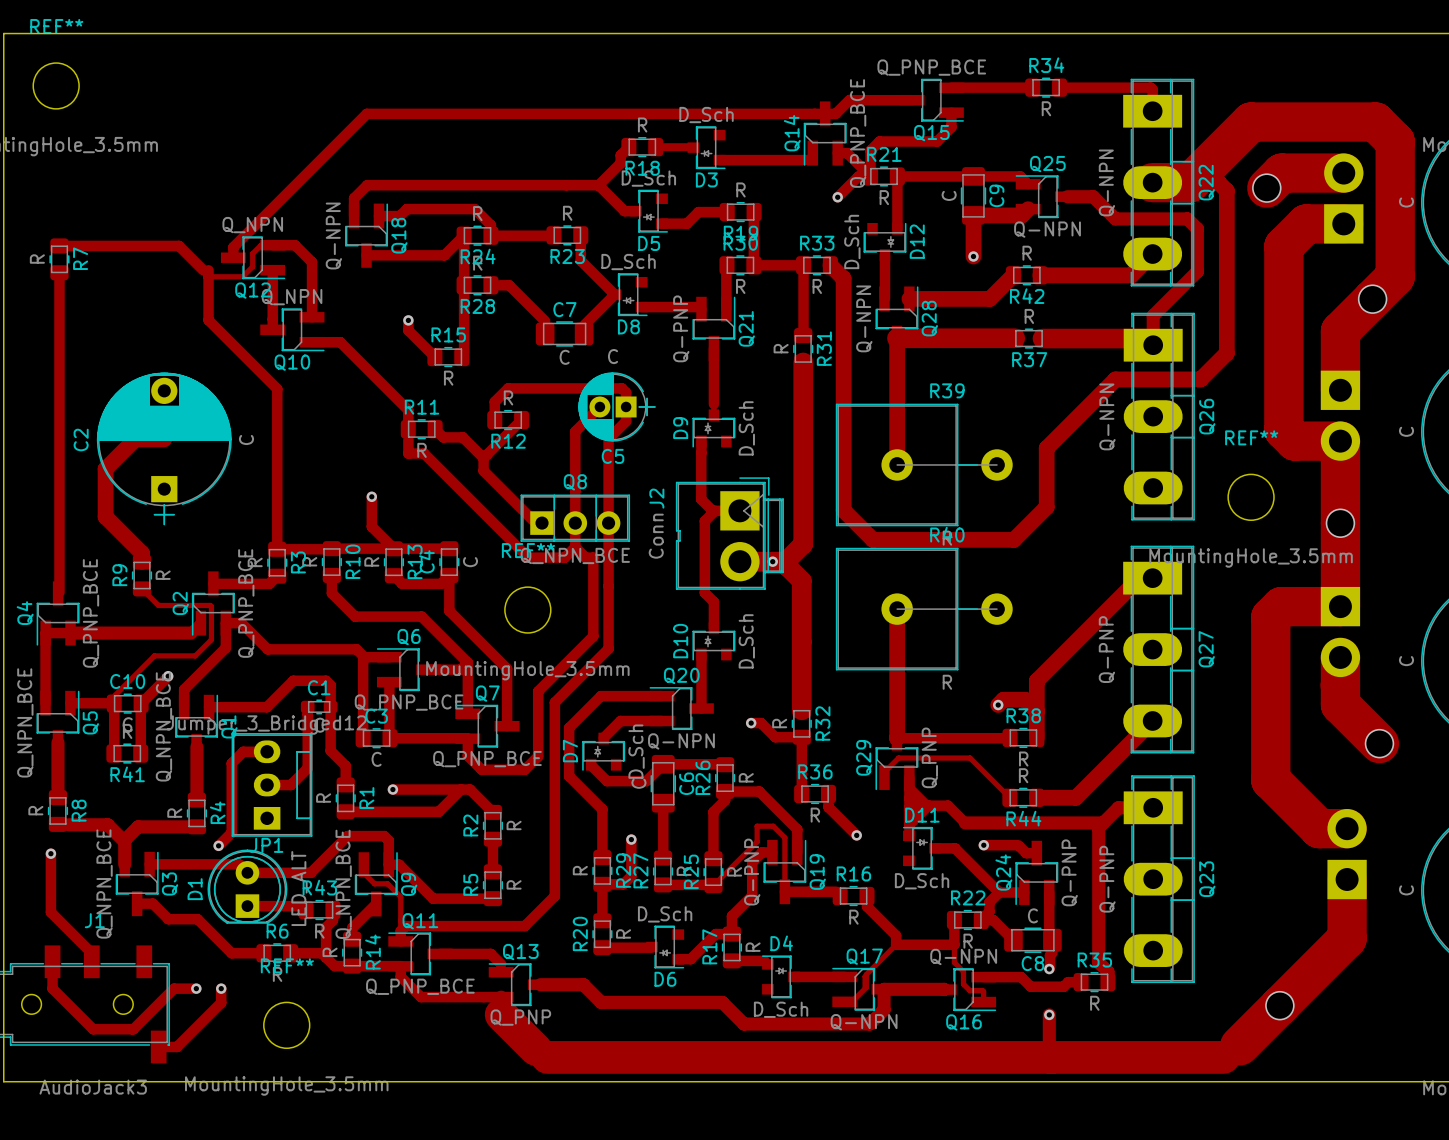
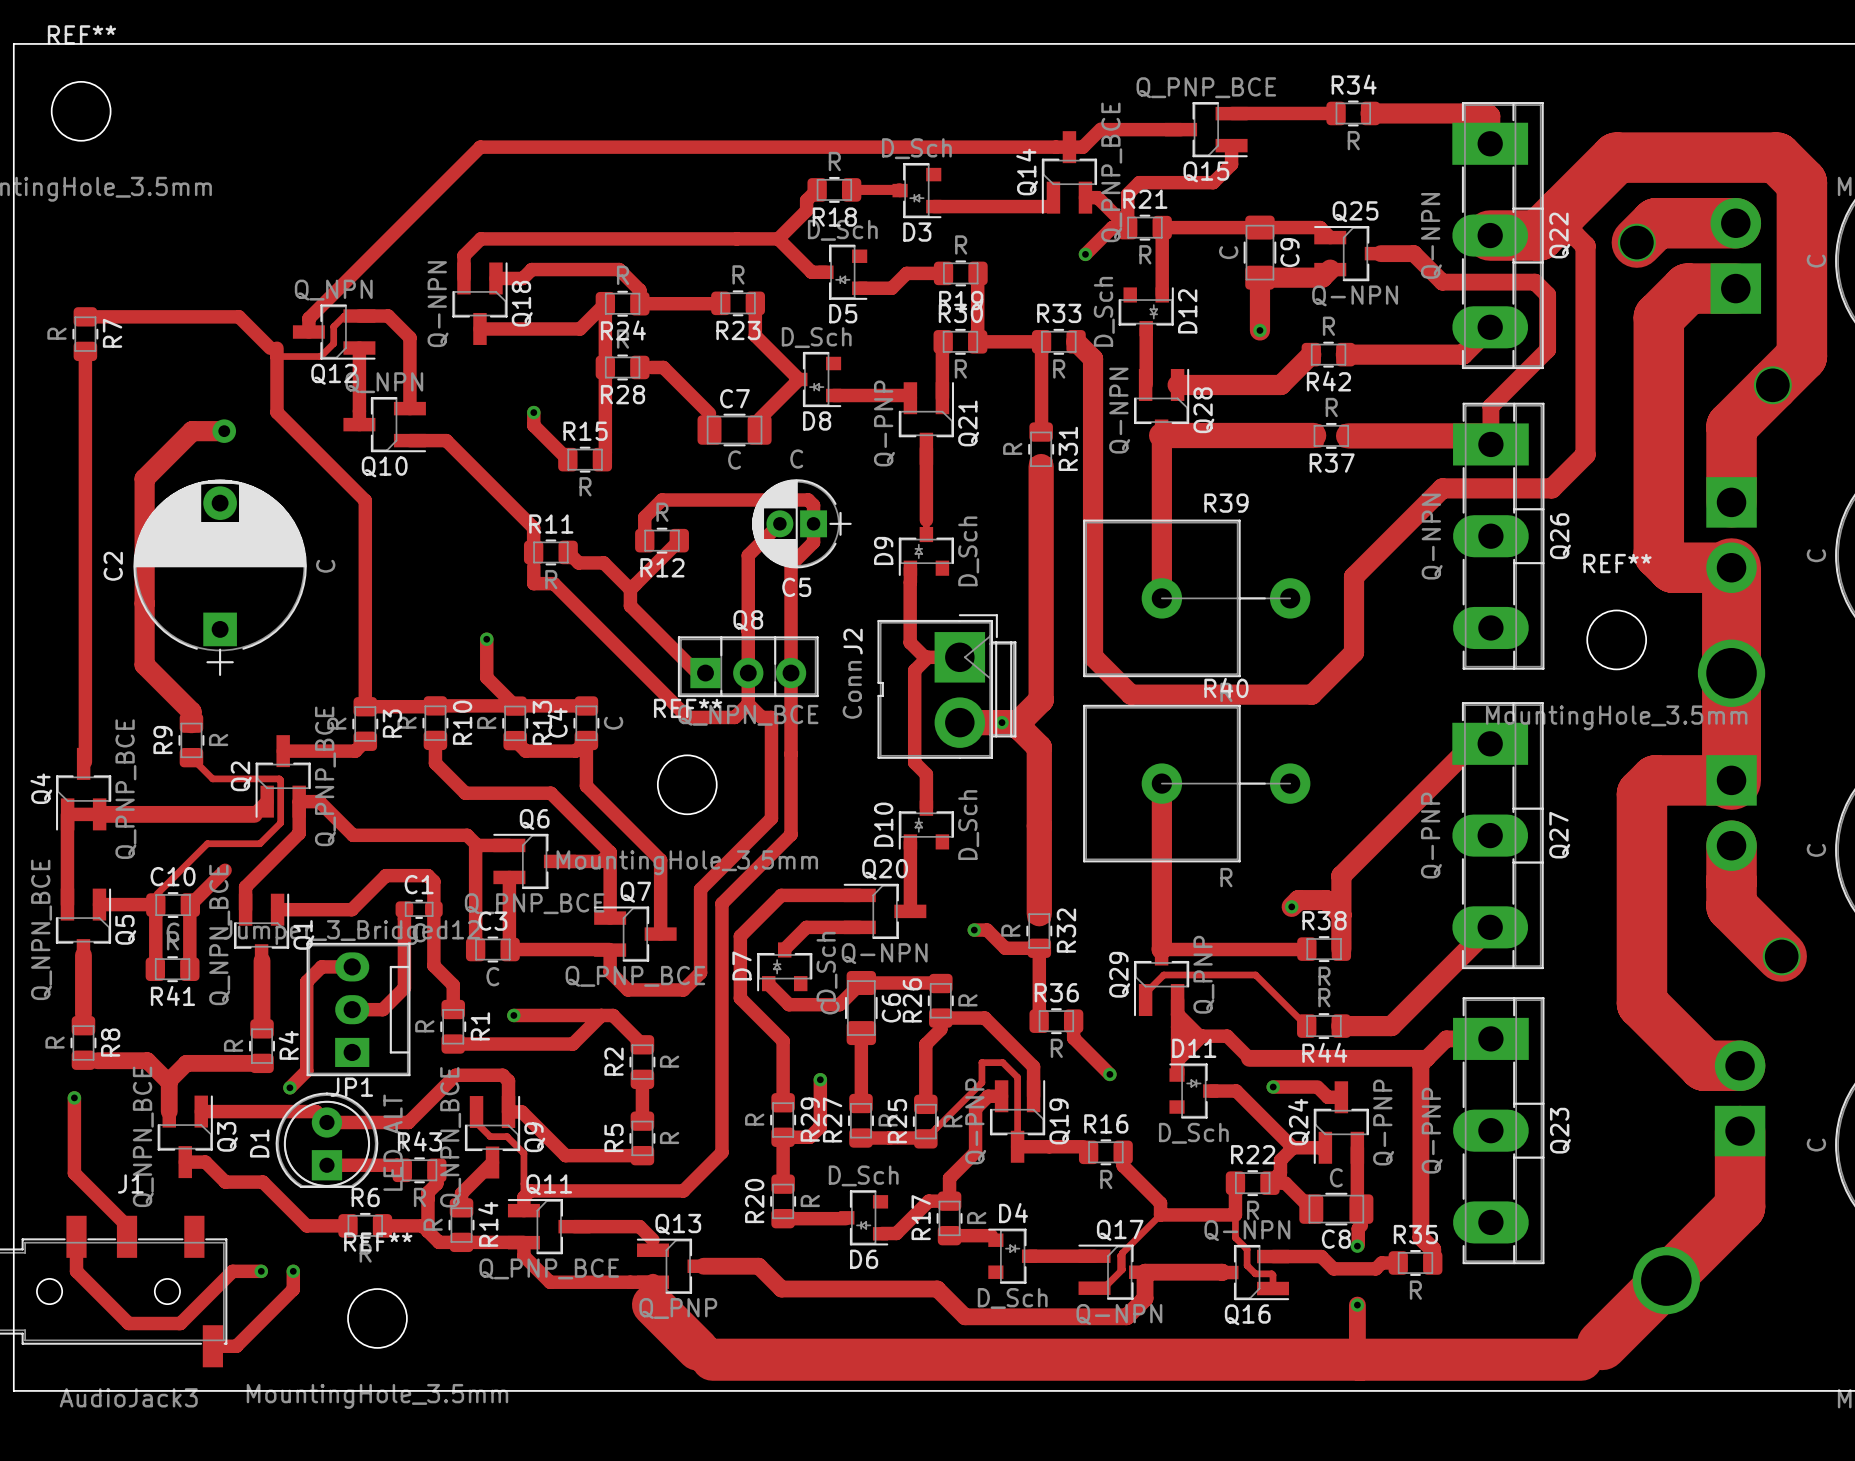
track width: thin (1059, 87) (1150, 87) (1152, 89) (1152, 111) -> thick (1370, 113) (1487, 113) (1490, 115) (1490, 143)
via: none -> (224, 431)
track: (164, 439) (135, 439) (105, 468) -> (224, 431) (192, 431) (144, 478) (144, 603)
track width: thin (1340, 441) (1340, 606) -> thick (1731, 567) (1731, 780)
via size: [1325, 508, 1356, 538] -> [1697, 639, 1766, 707]
via: (168, 676) -> none
via: none -> (1666, 1280)
via: (1279, 1005) -> none

